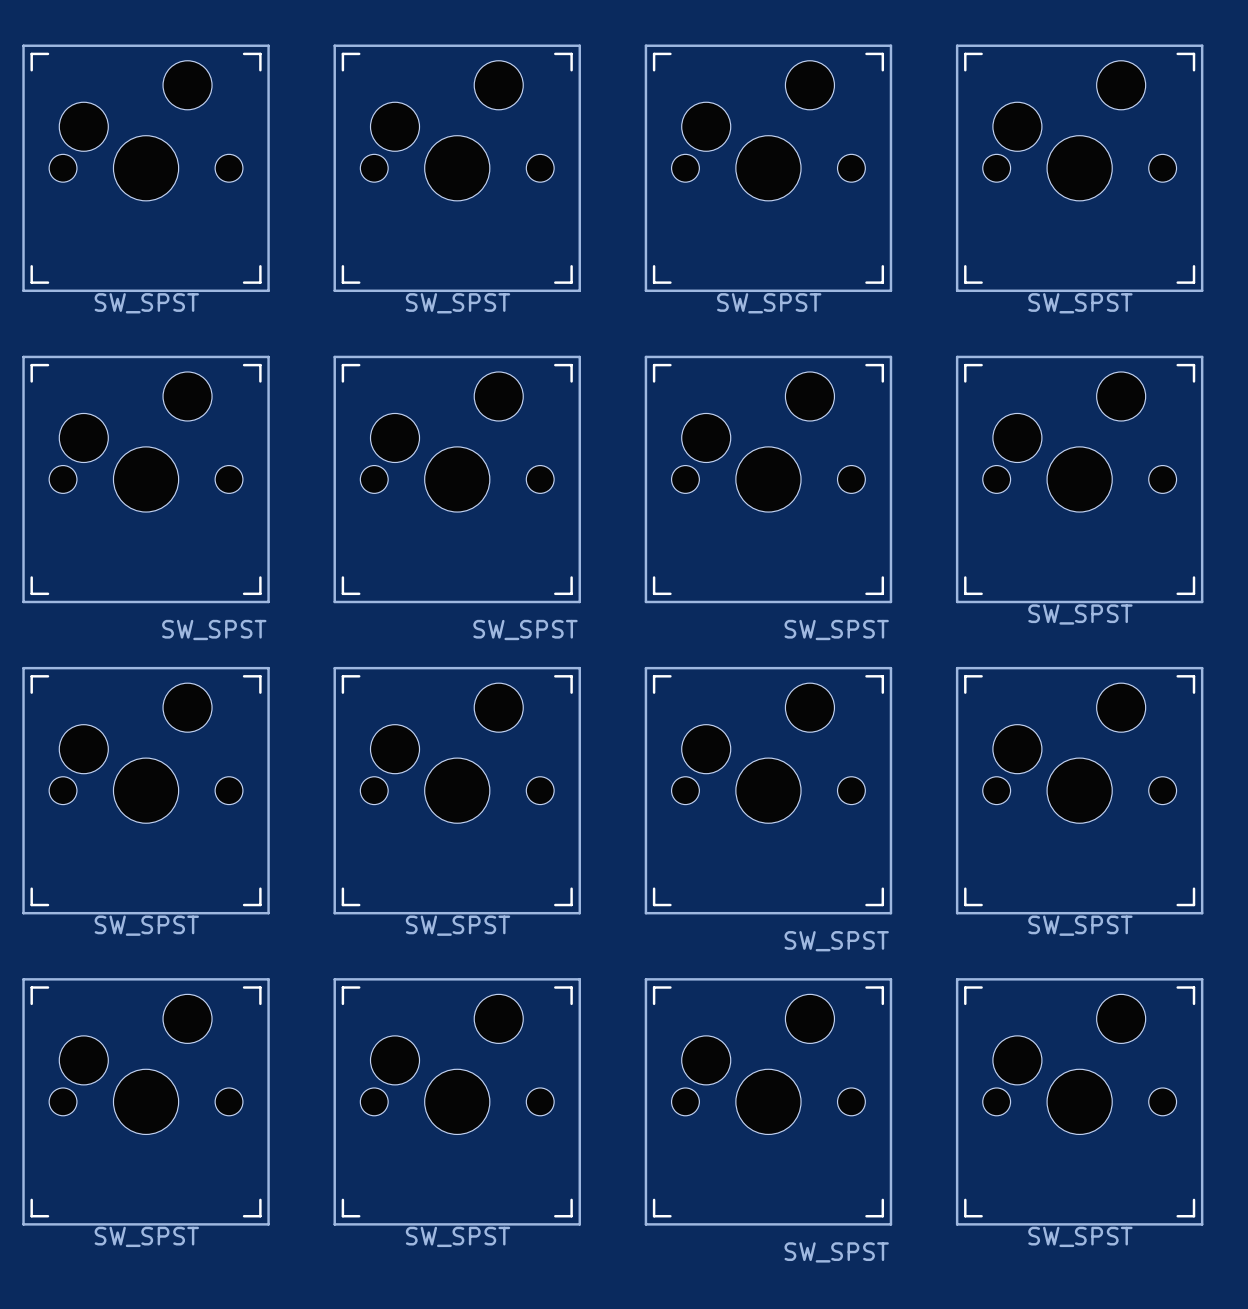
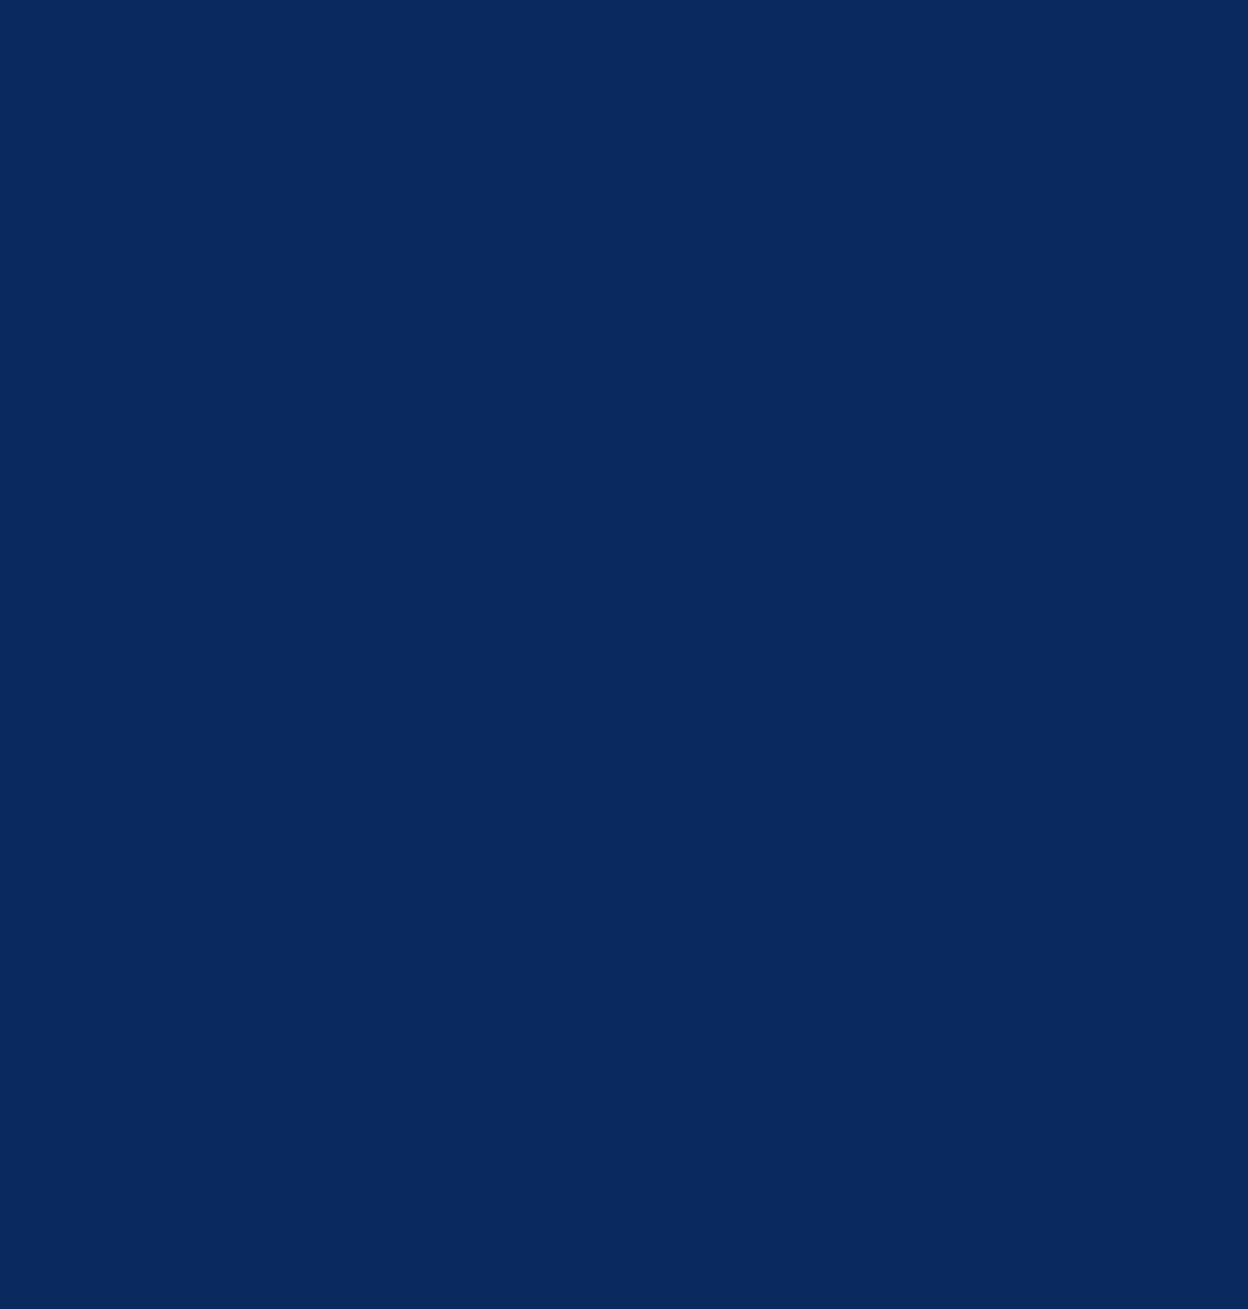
part: SW_SPST (146, 168) -> none
part: SW_SPST (457, 168) -> none
part: SW_SPST (768, 168) -> none
part: SW_SPST (1079, 168) -> none
part: SW_SPST (146, 479) -> none
part: SW_SPST (457, 479) -> none
part: SW_SPST (768, 479) -> none
part: SW_SPST (1079, 479) -> none
part: SW_SPST (146, 790) -> none
part: SW_SPST (457, 790) -> none
part: SW_SPST (768, 790) -> none
part: SW_SPST (1079, 790) -> none
part: SW_SPST (146, 1101) -> none
part: SW_SPST (457, 1101) -> none
part: SW_SPST (768, 1101) -> none
part: SW_SPST (1079, 1101) -> none

